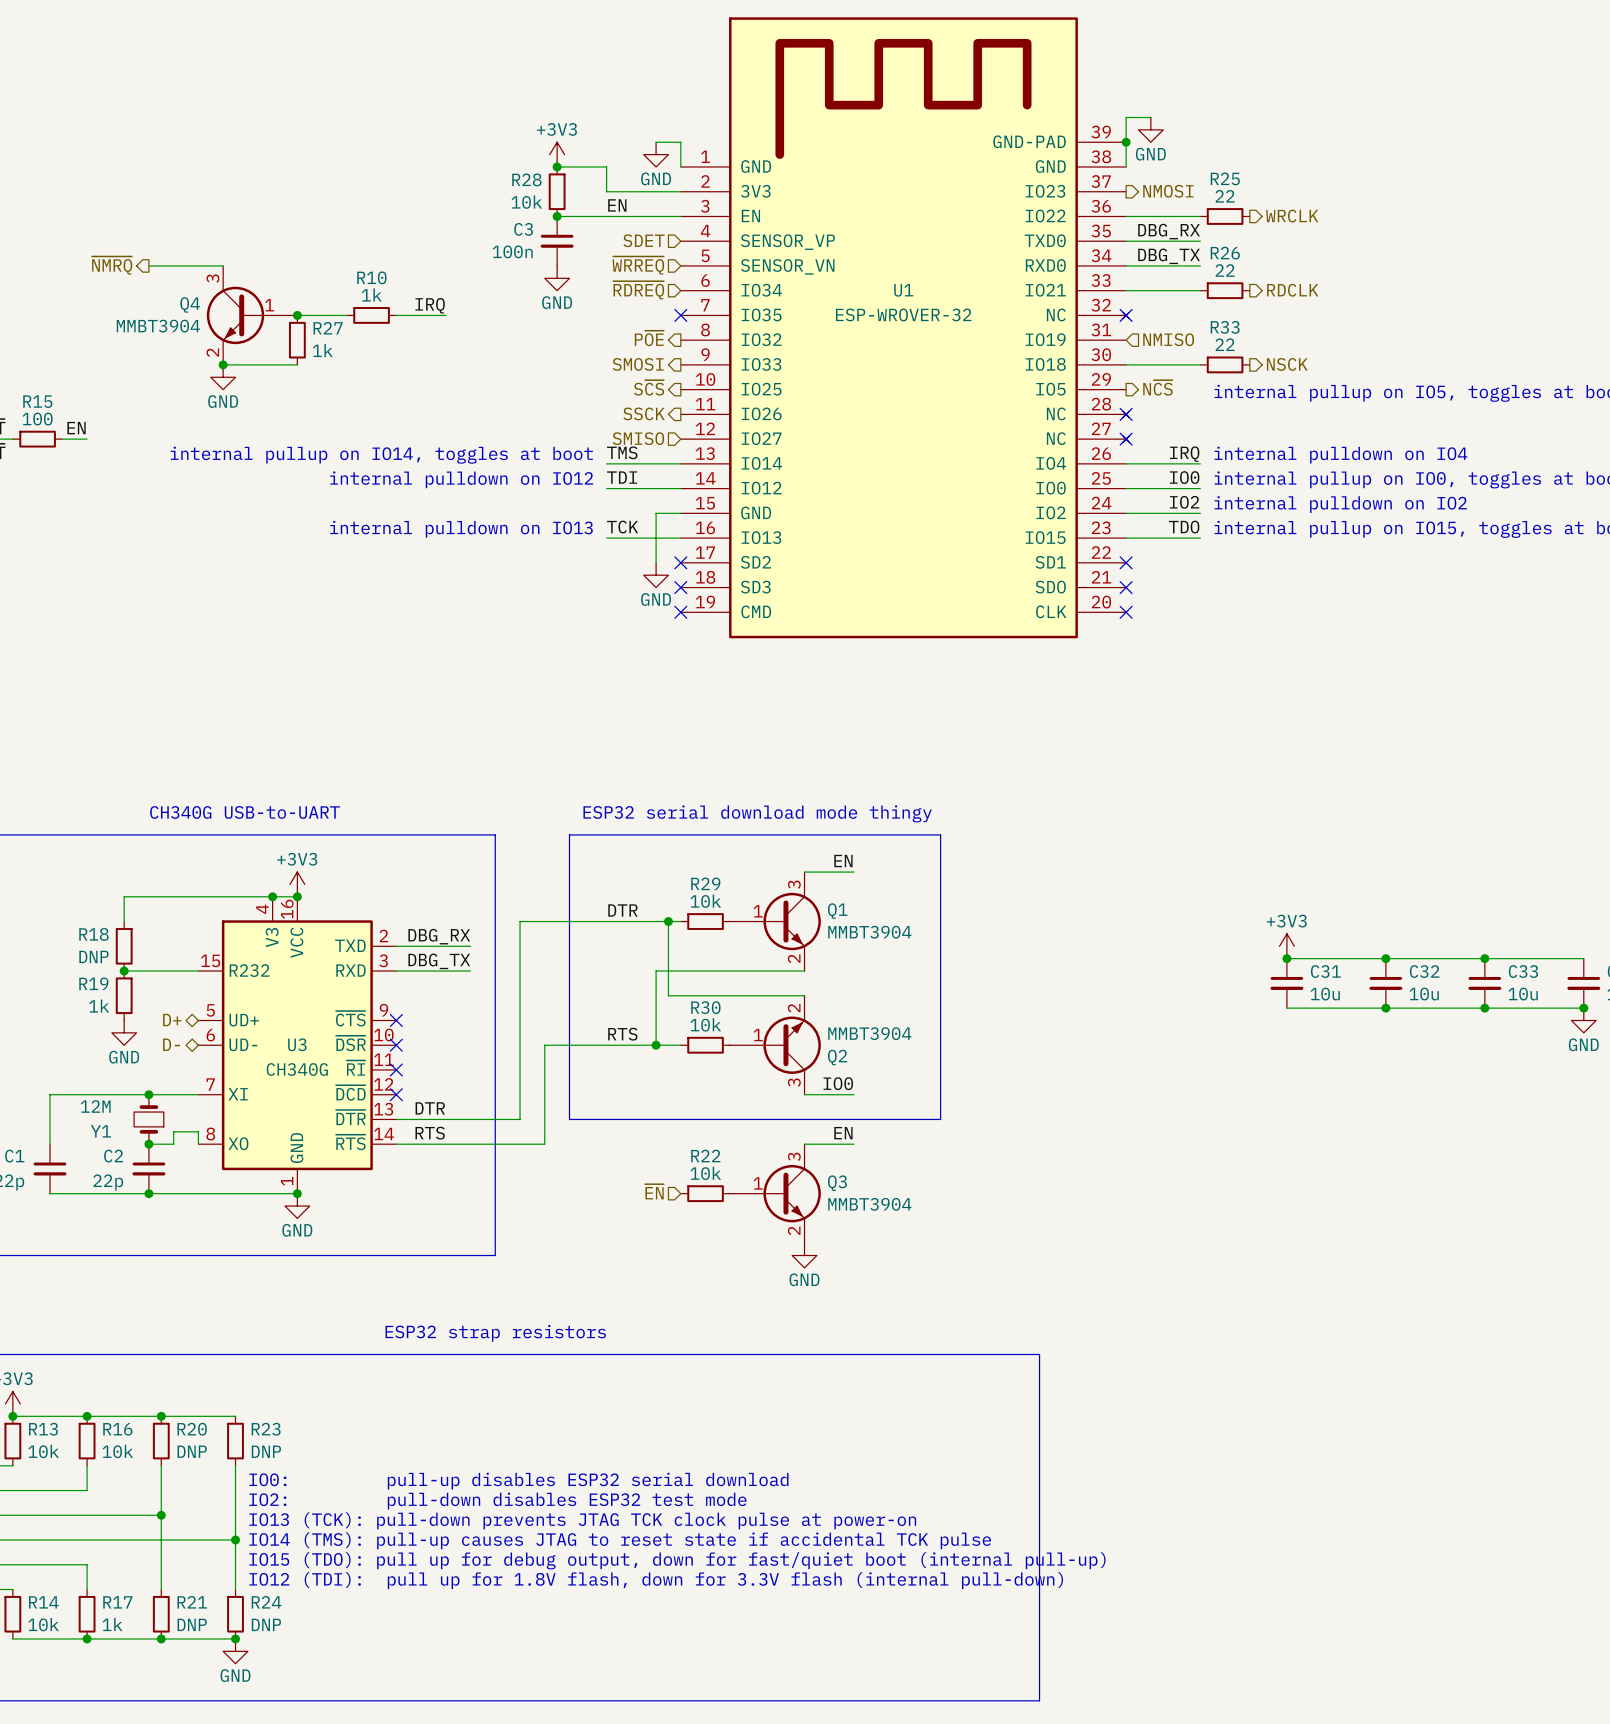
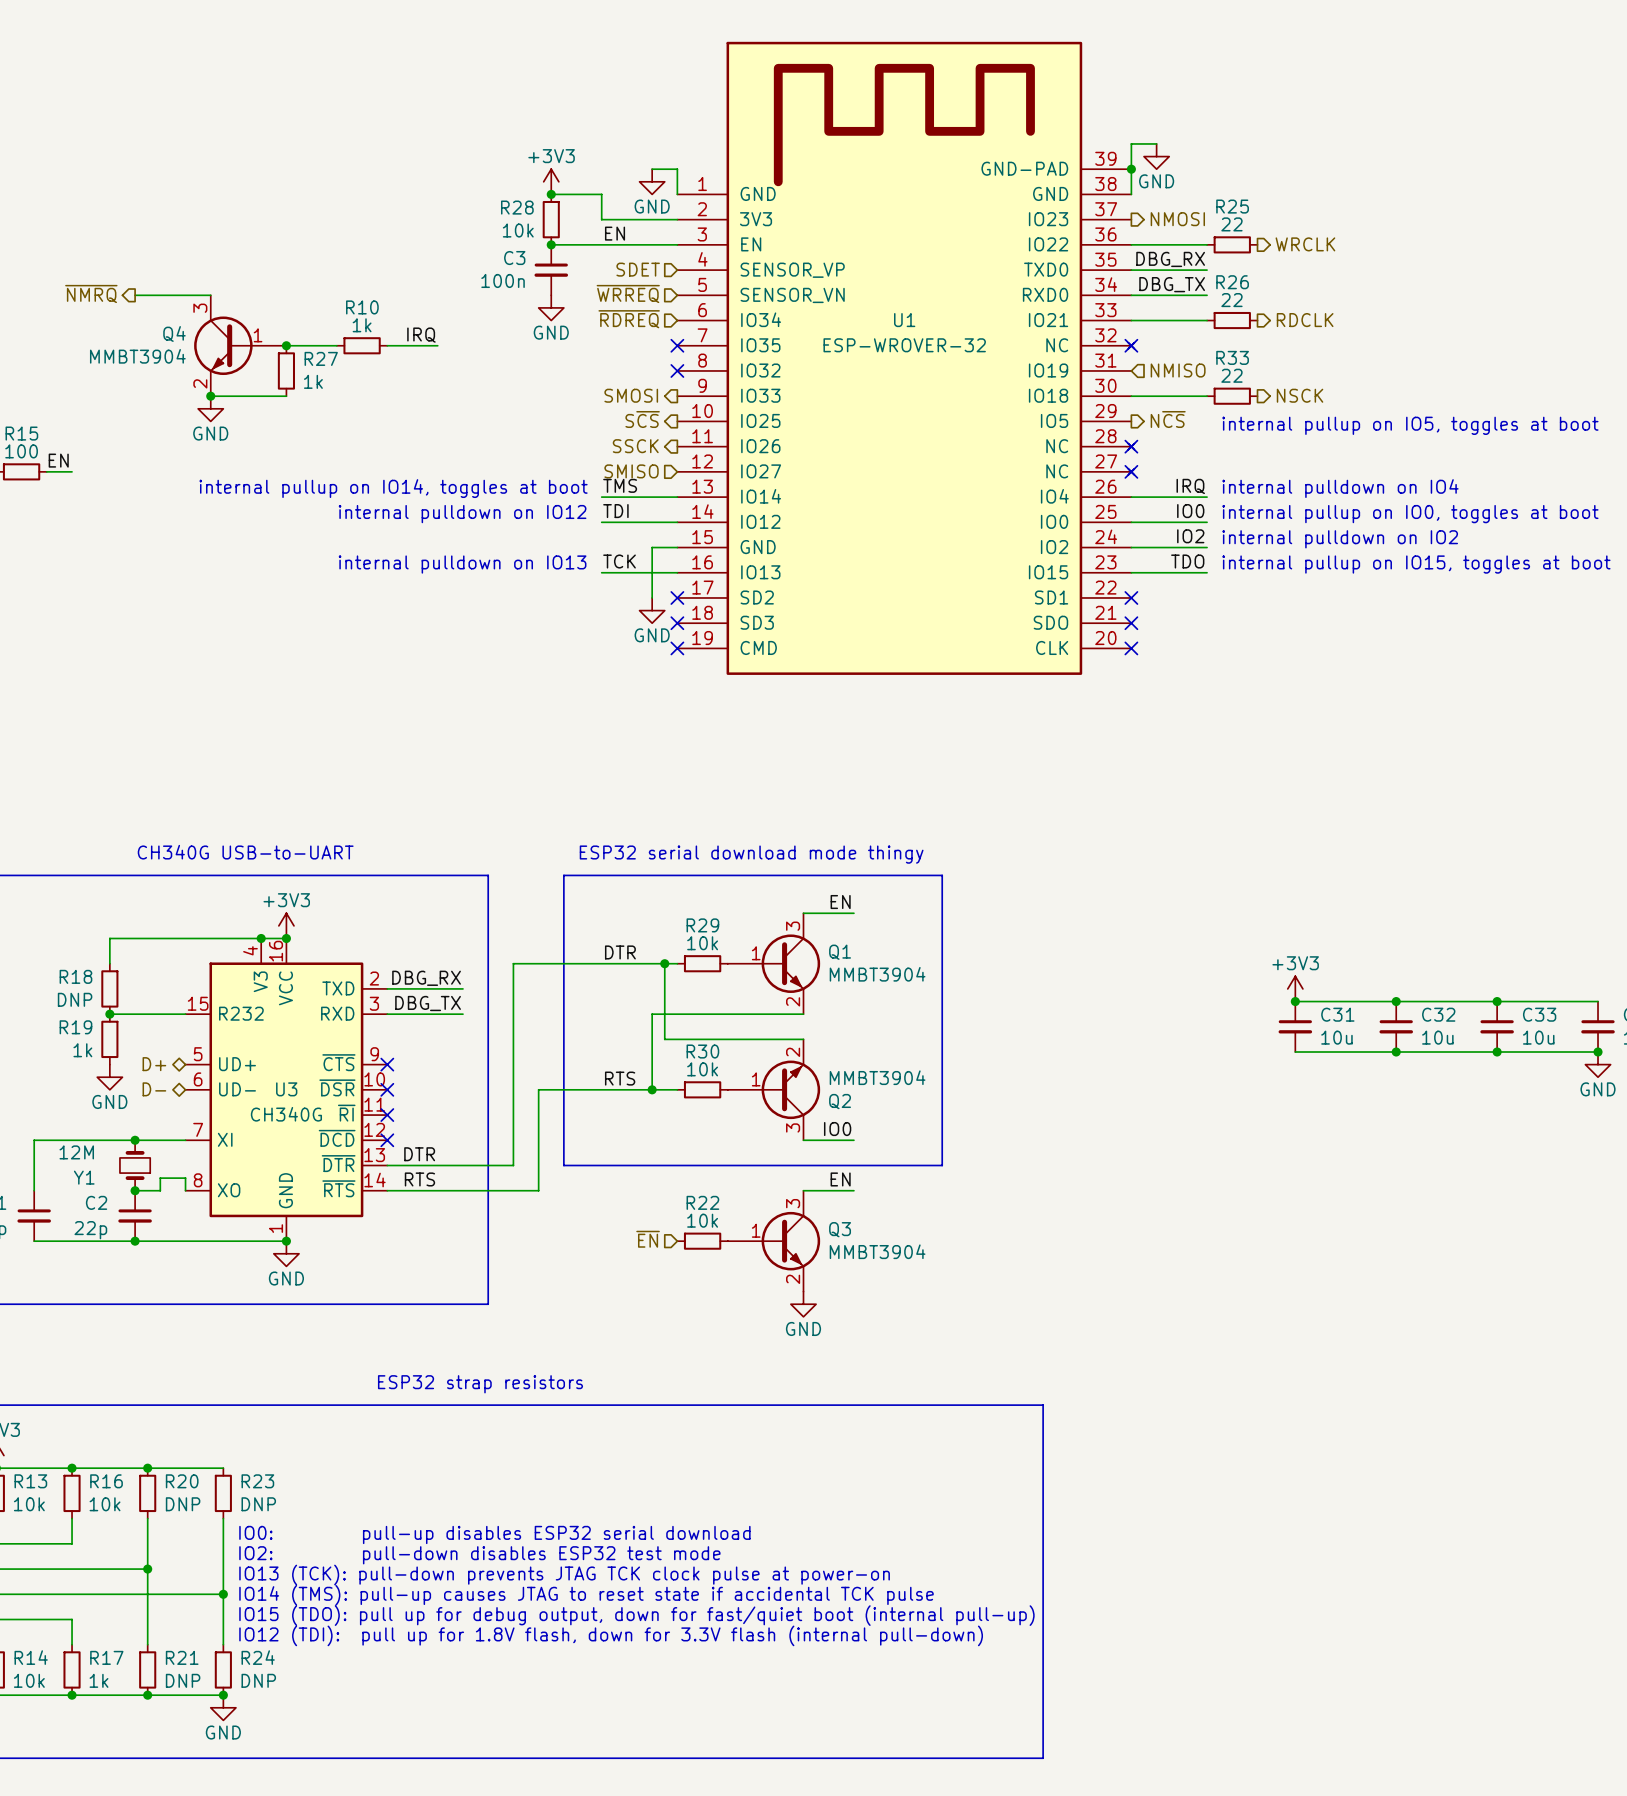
hierarchical label: P~{OE} (649, 338) -> none
no-connect mark: none -> (677, 370)

